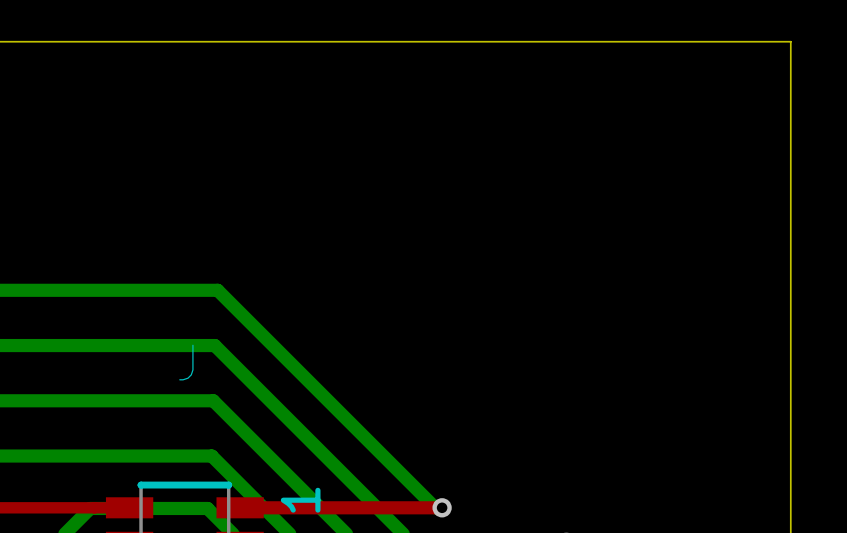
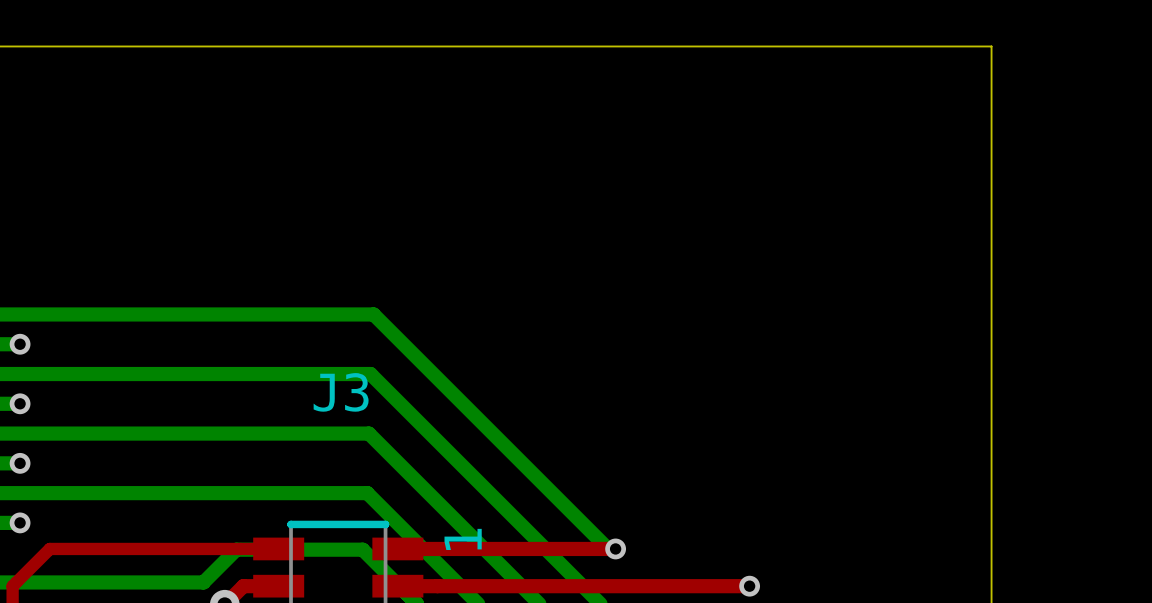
J name: J (186, 362) -> J3 (341, 392)

